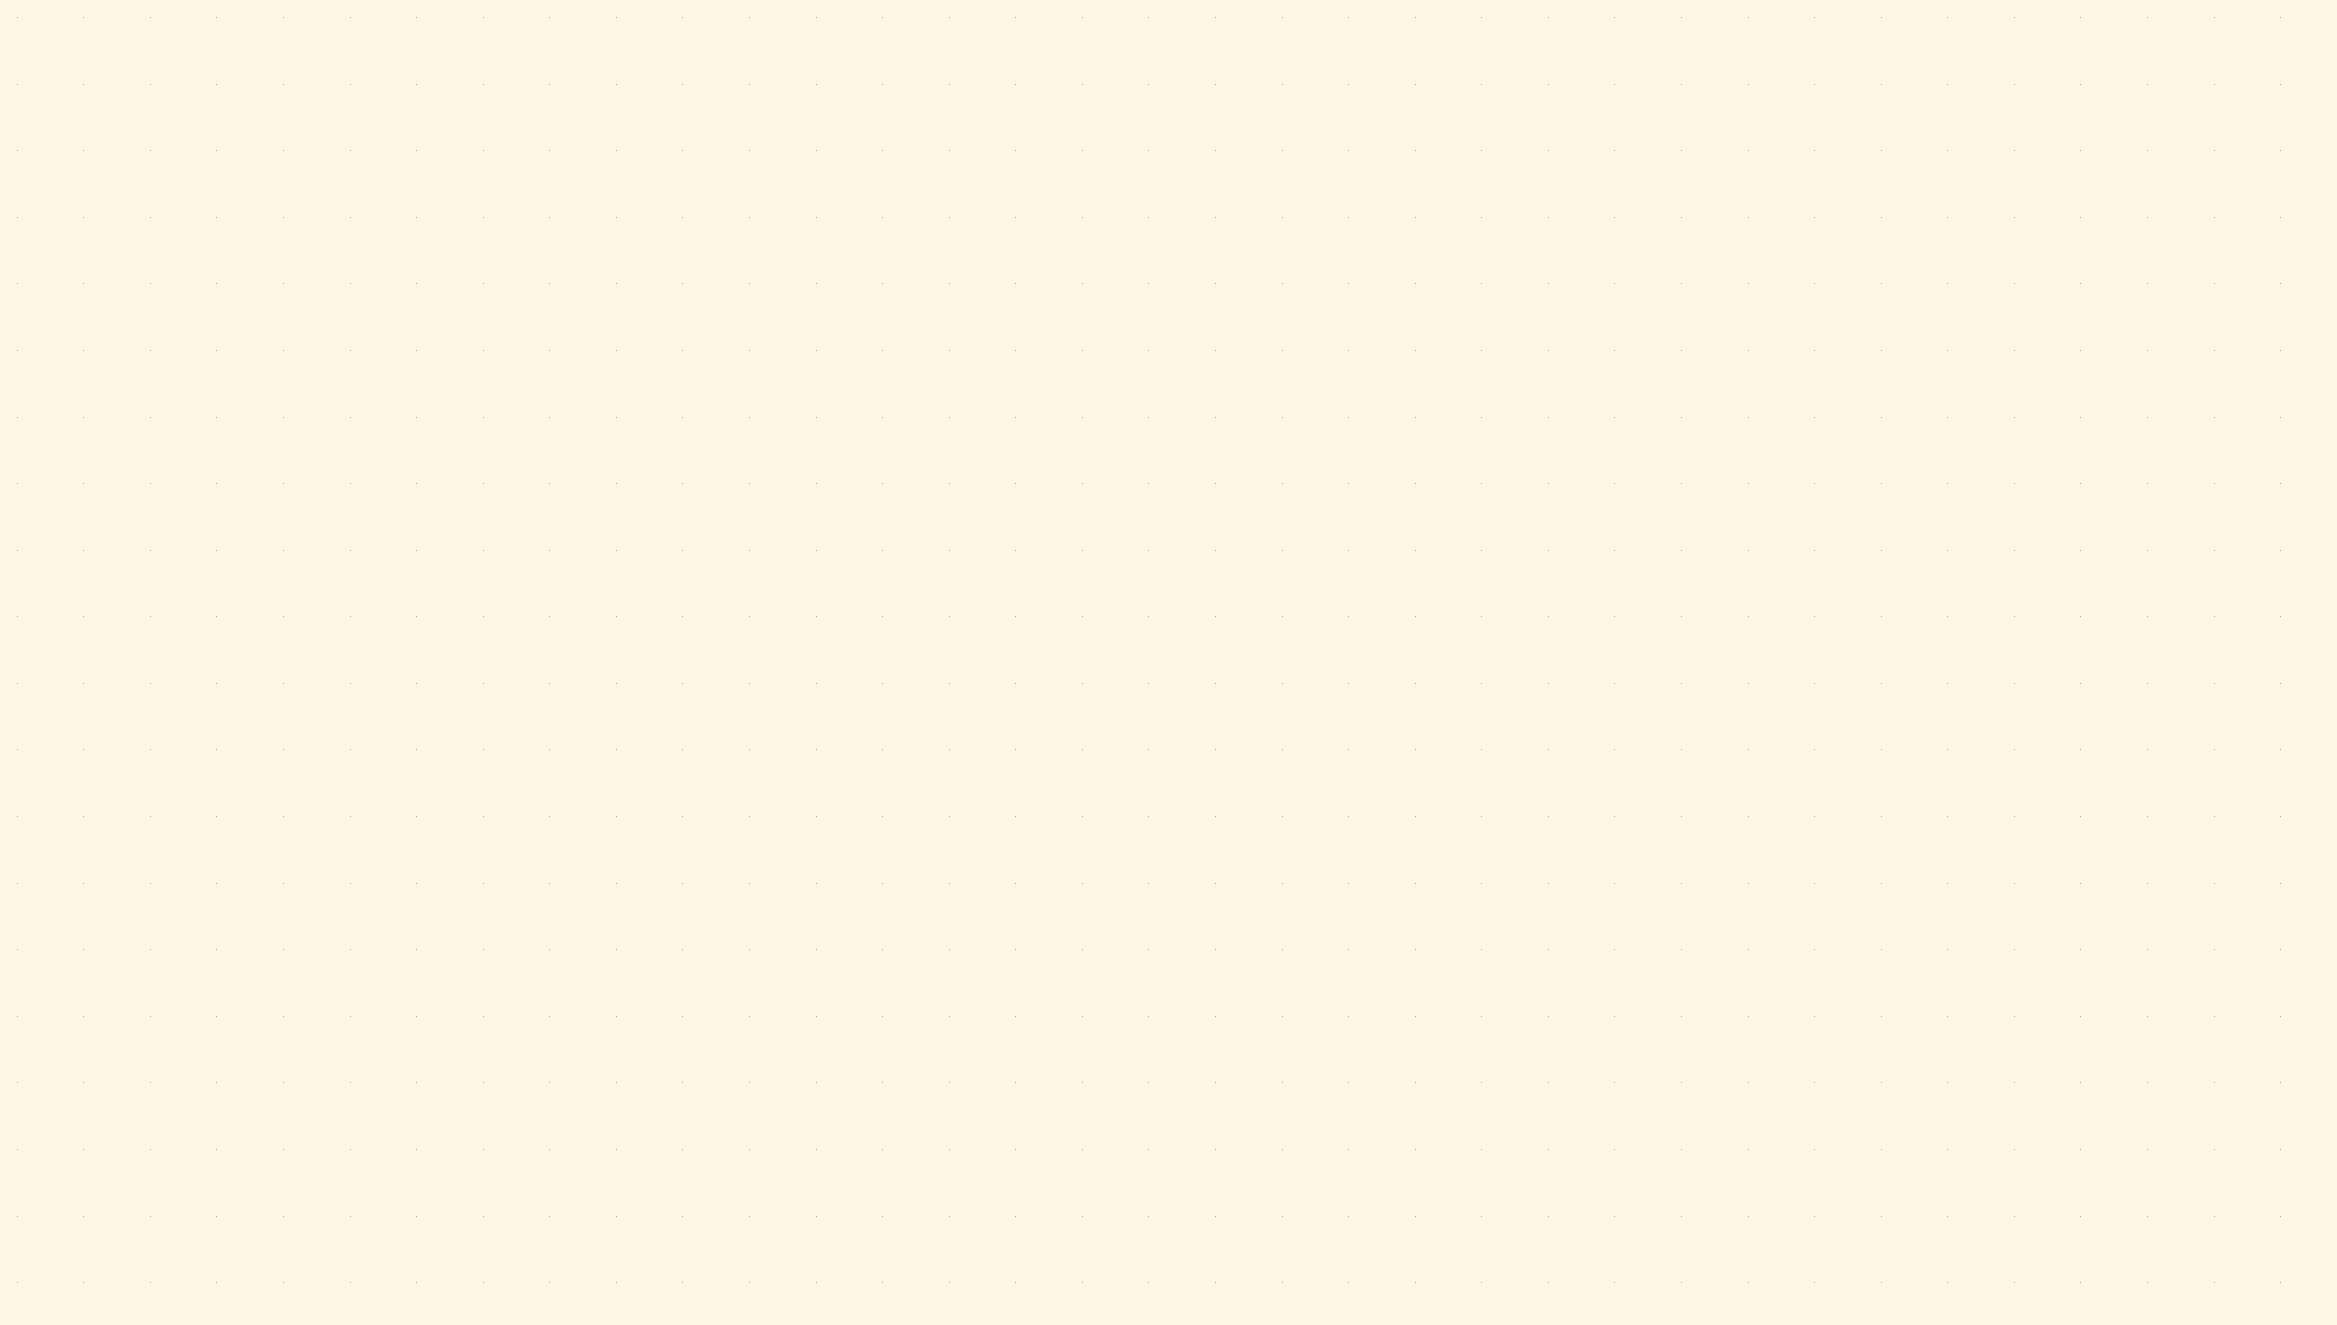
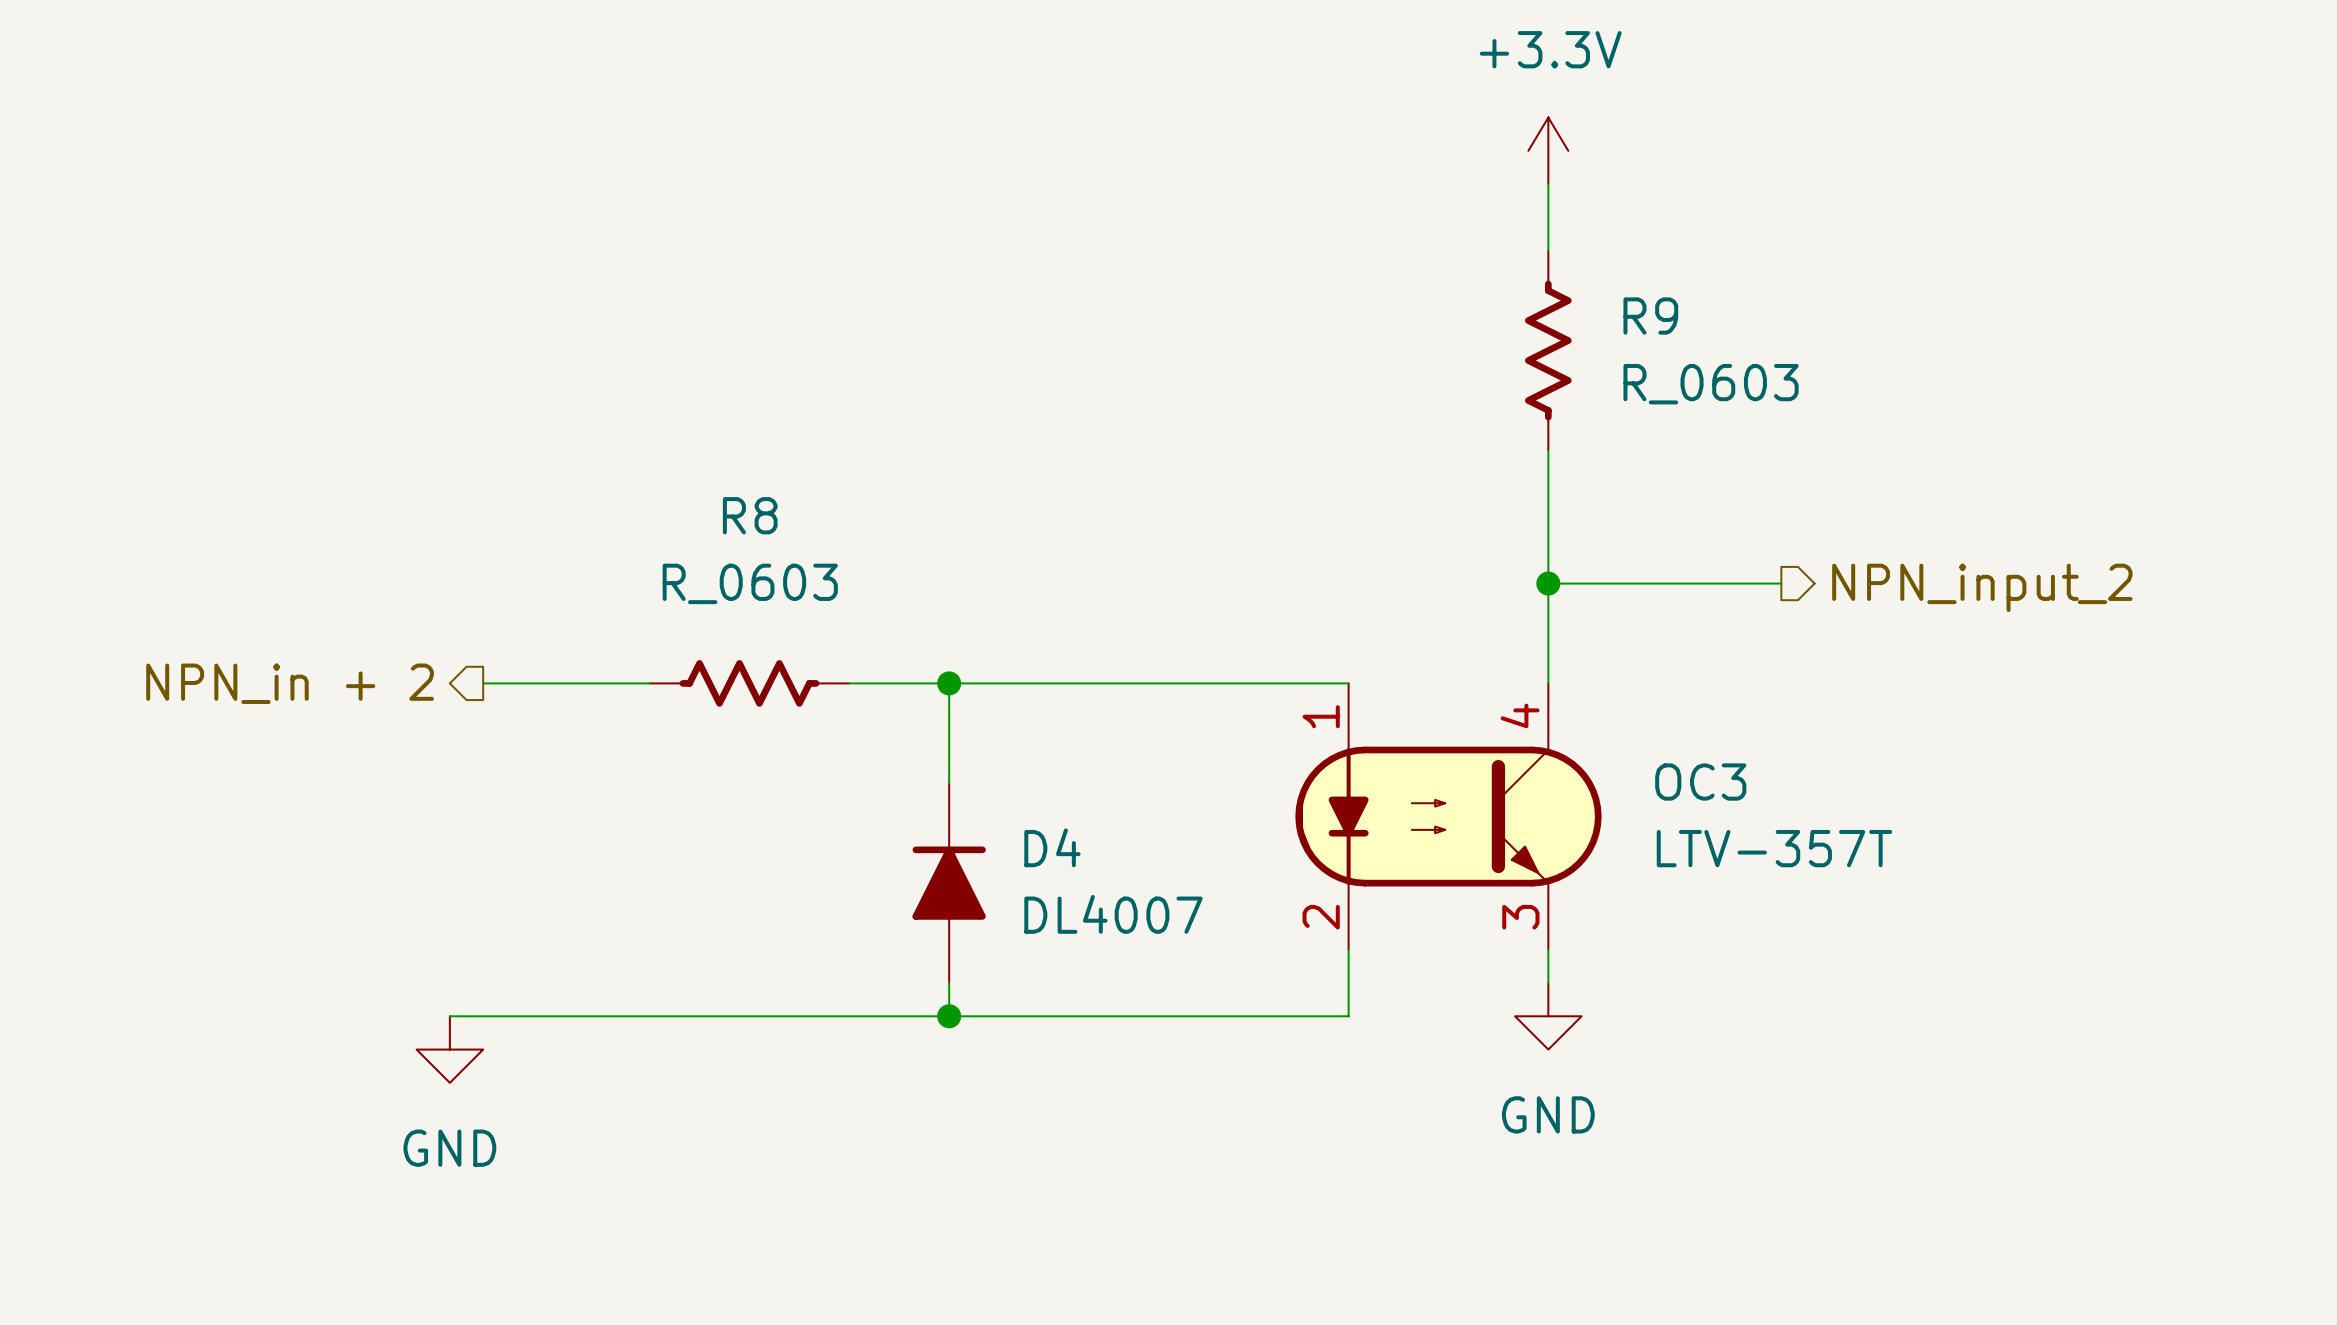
power symbol: none -> +3.3V (1548, 150)
wire: none -> (1548, 184) (1548, 250)
R9: none -> R_0603 (1548, 350)
wire: none -> (1548, 450) (1548, 683)
wire: none -> (1548, 583) (1781, 583)
junction: none -> (1548, 583)
hierarchical label: none -> NPN_input_2 (1982, 587)
hierarchical label: none -> NPN_in + 2 (290, 683)
wire: none -> (483, 683) (649, 683)
R8: none -> R_0603 (749, 683)
wire: none -> (849, 683) (1348, 683)
wire: none -> (949, 683) (949, 783)
junction: none -> (949, 683)
OC3: none -> LTV-357T (1448, 816)
D4: none -> DL4007 (949, 883)
wire: none -> (1348, 949) (1348, 1016) (449, 1016)
wire: none -> (1548, 949) (1548, 982)
wire: none -> (949, 982) (949, 1016)
junction: none -> (949, 1016)
power symbol: none -> GND (1548, 1016)
power symbol: none -> GND (449, 1049)

